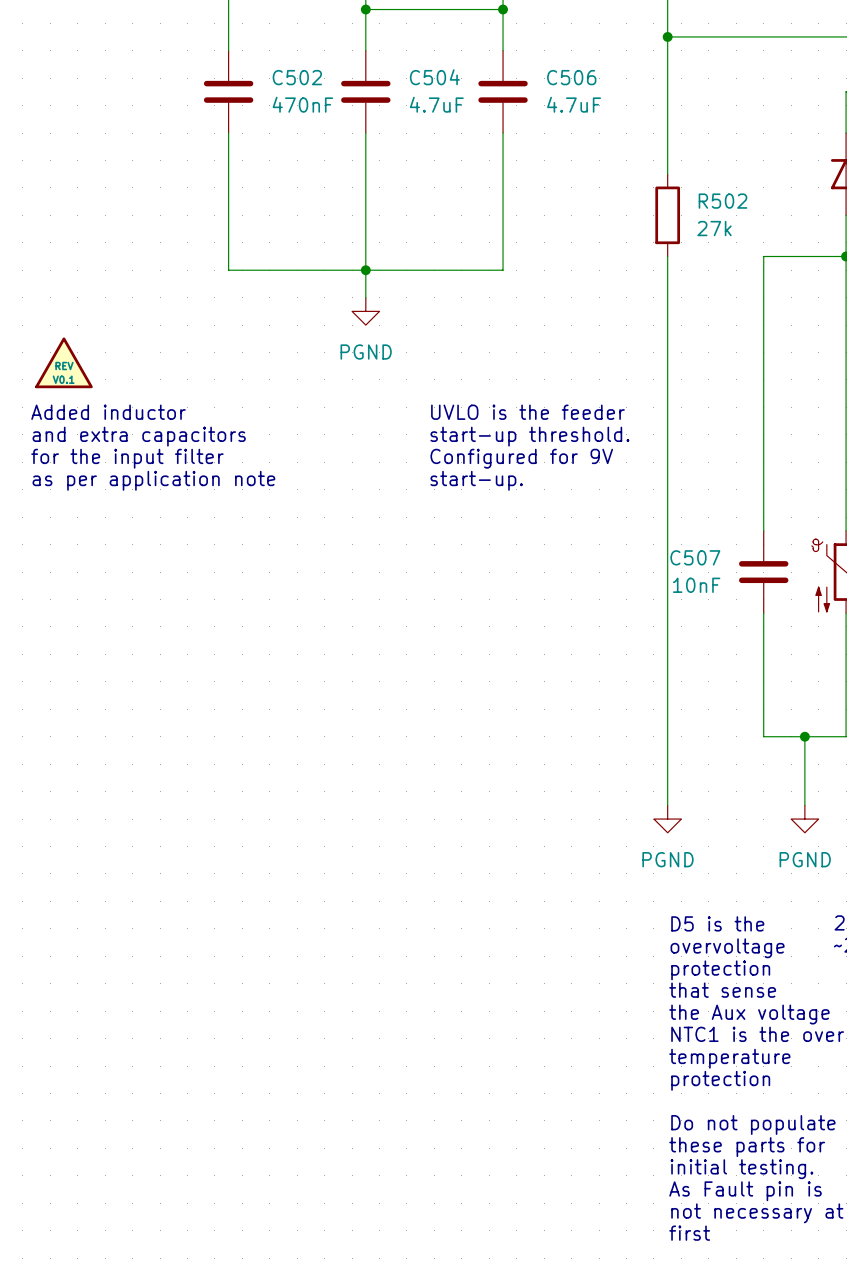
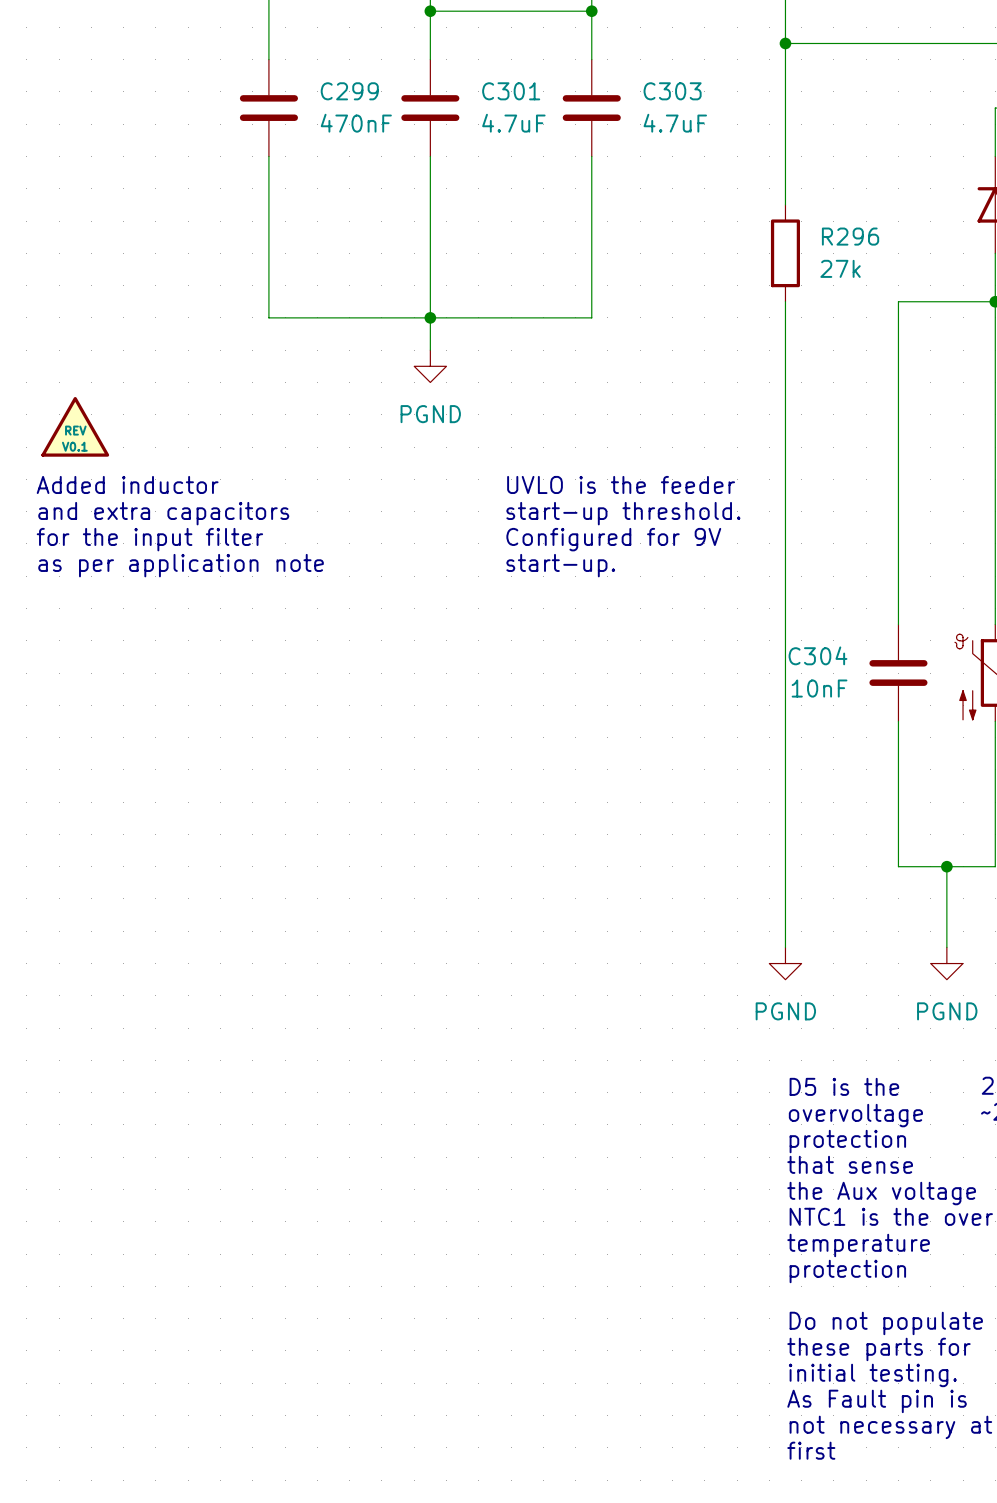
C502 name: C502 (297, 77) -> C299 (349, 91)
C504 name: C504 (434, 77) -> C301 (511, 91)
C506 name: C506 (571, 77) -> C303 (672, 91)
R502 name: R502 (722, 201) -> R296 (850, 236)
C507 name: C507 (695, 557) -> C304 (818, 655)

